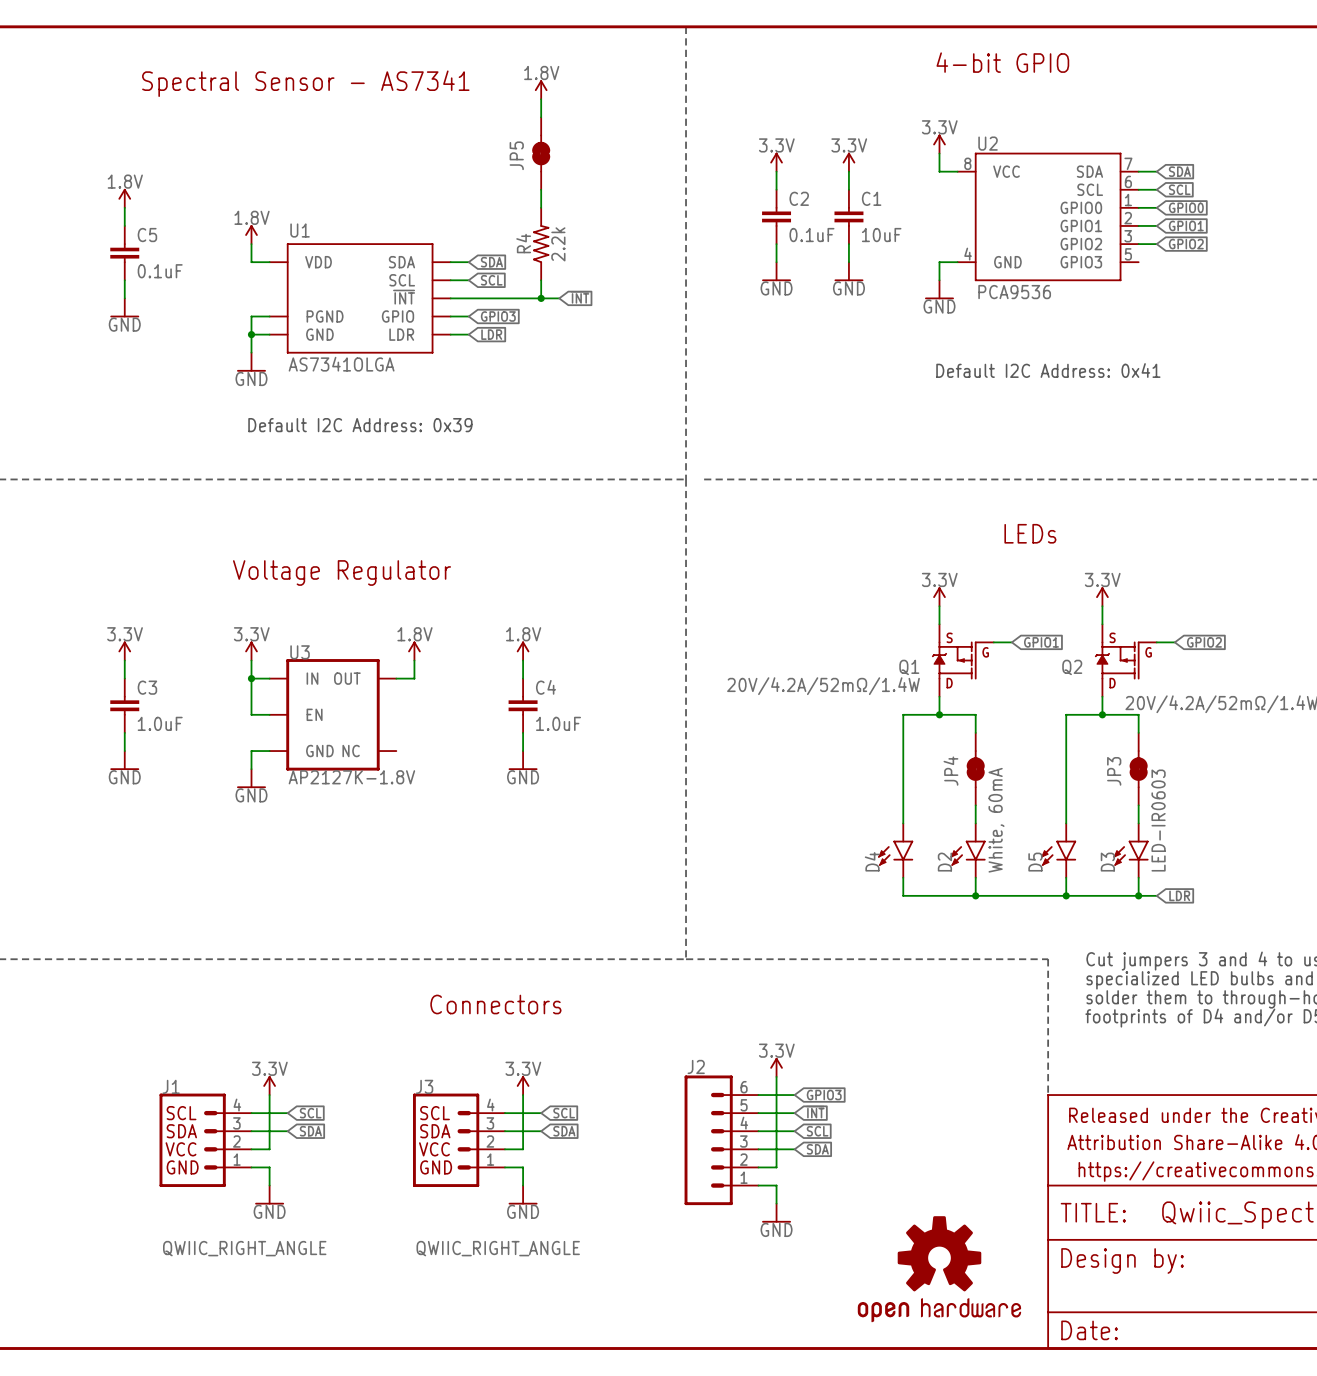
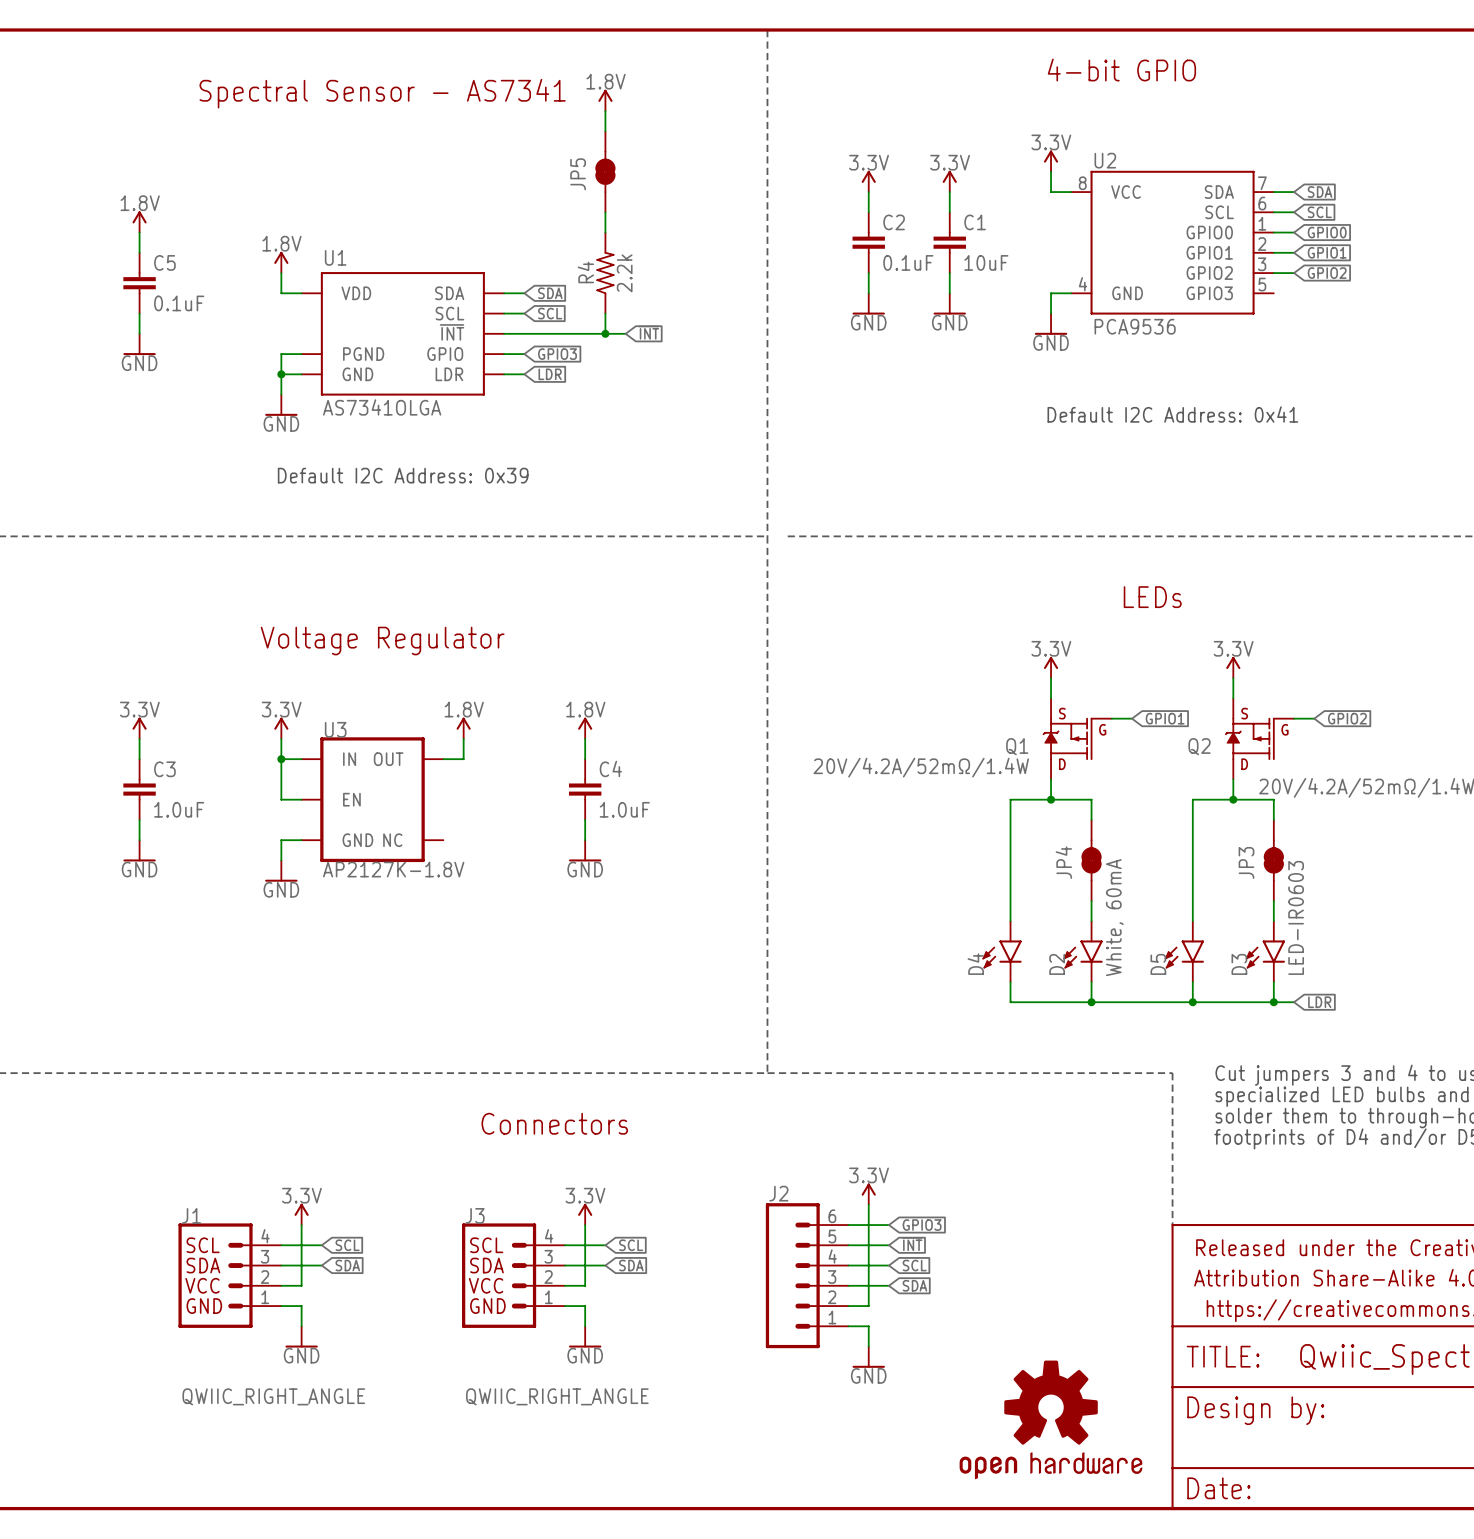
text position: Spectral Sensor - AS7341 (305, 83) -> Spectral Sensor - AS7341 (382, 93)

